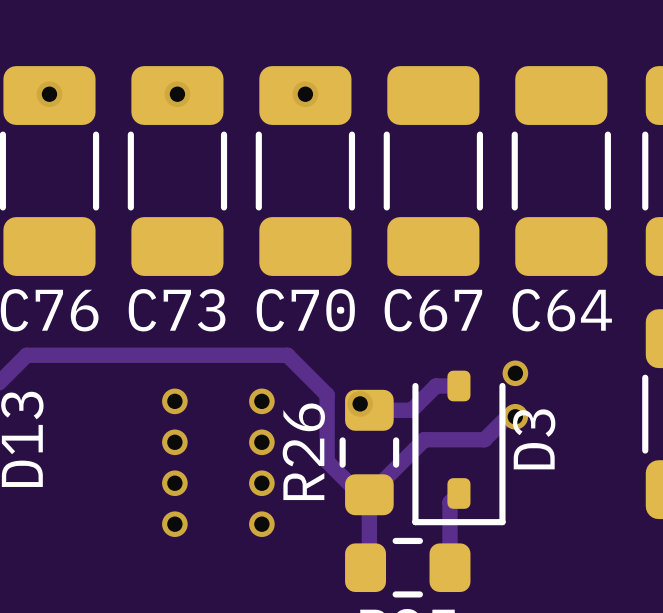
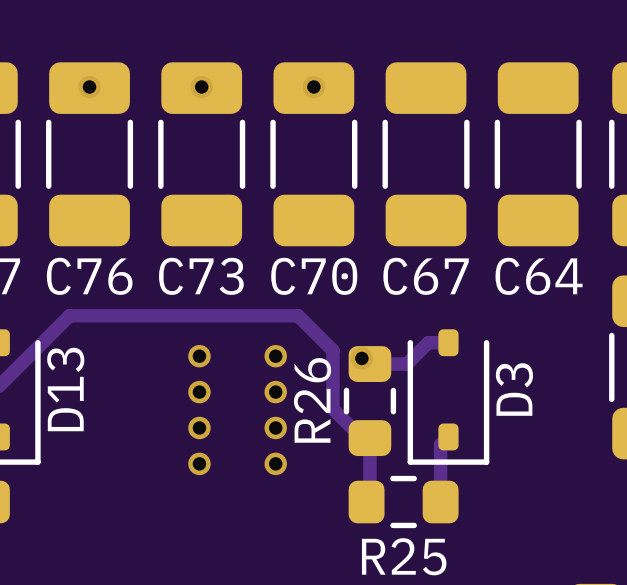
via: (515, 373) -> none
track: (515, 416) (507, 416) (484, 439) (424, 439) (369, 494) -> none
via: (515, 416) -> none

